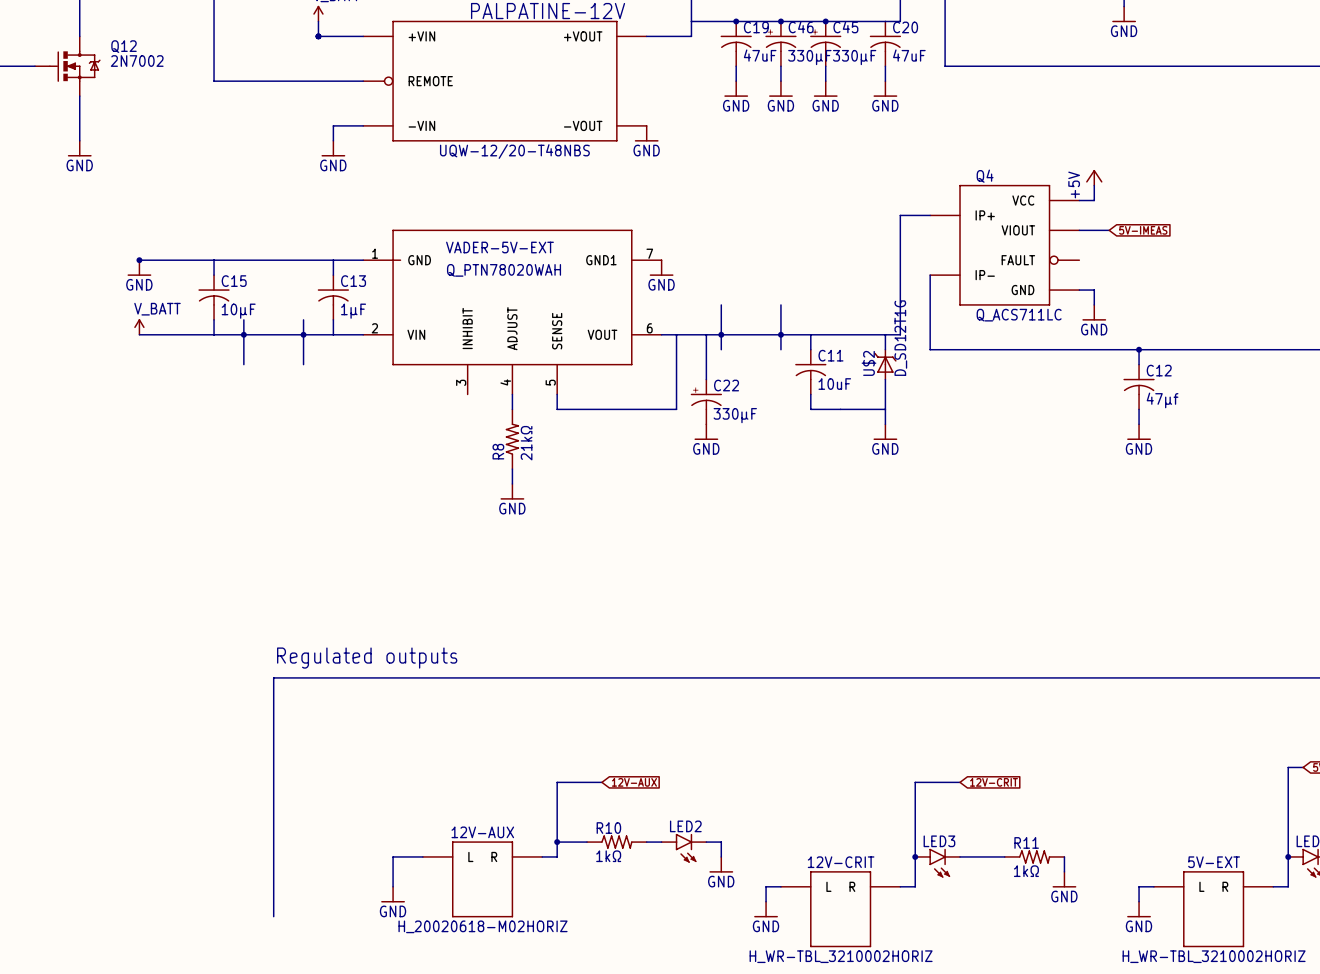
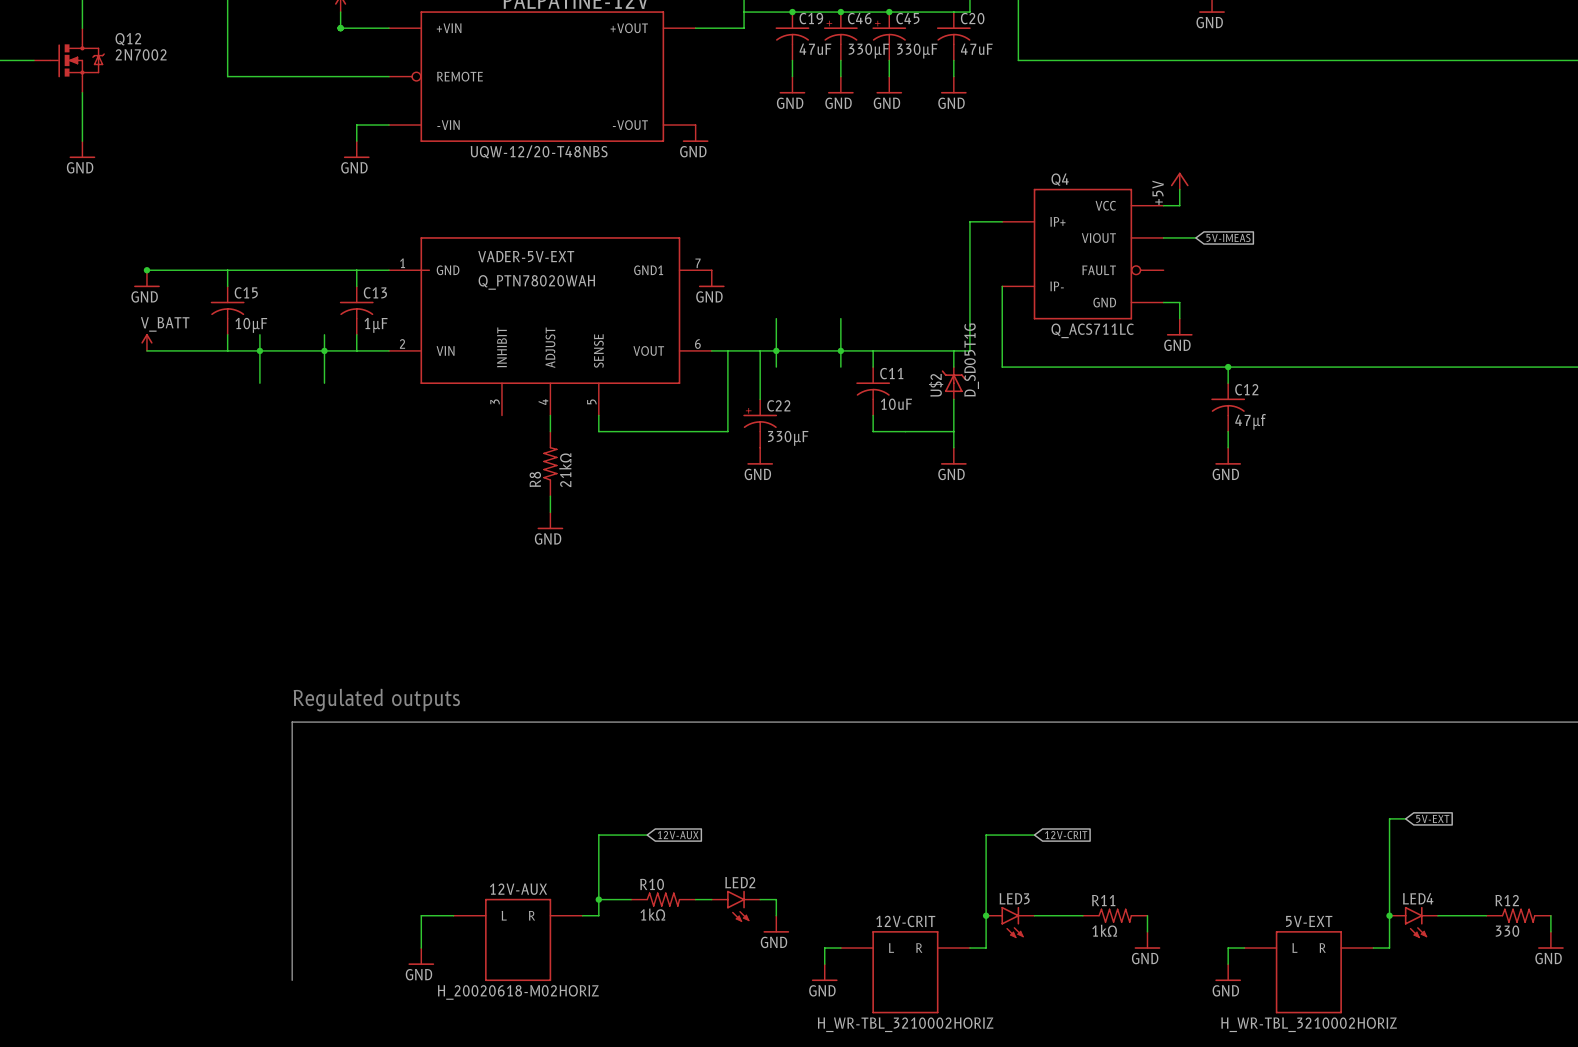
U$2 value: D_SD12T1G (900, 338) -> D_SD05T1G (971, 360)

